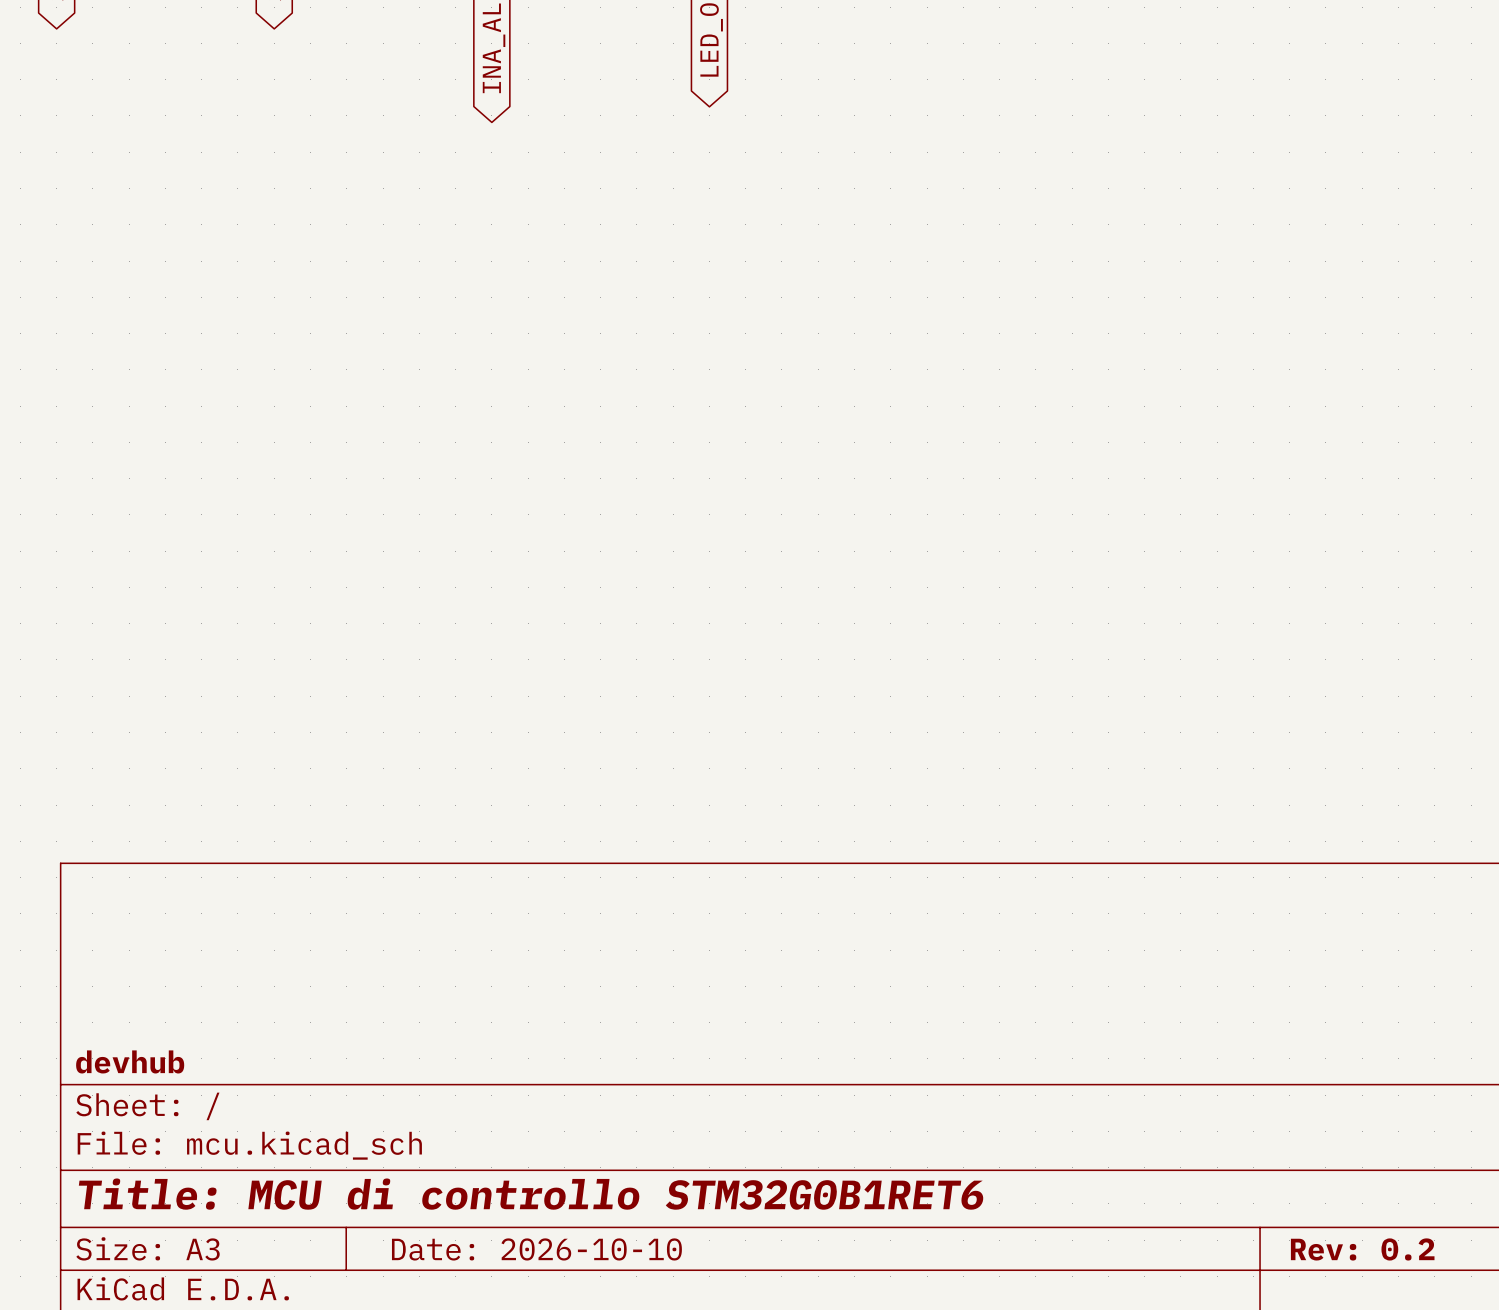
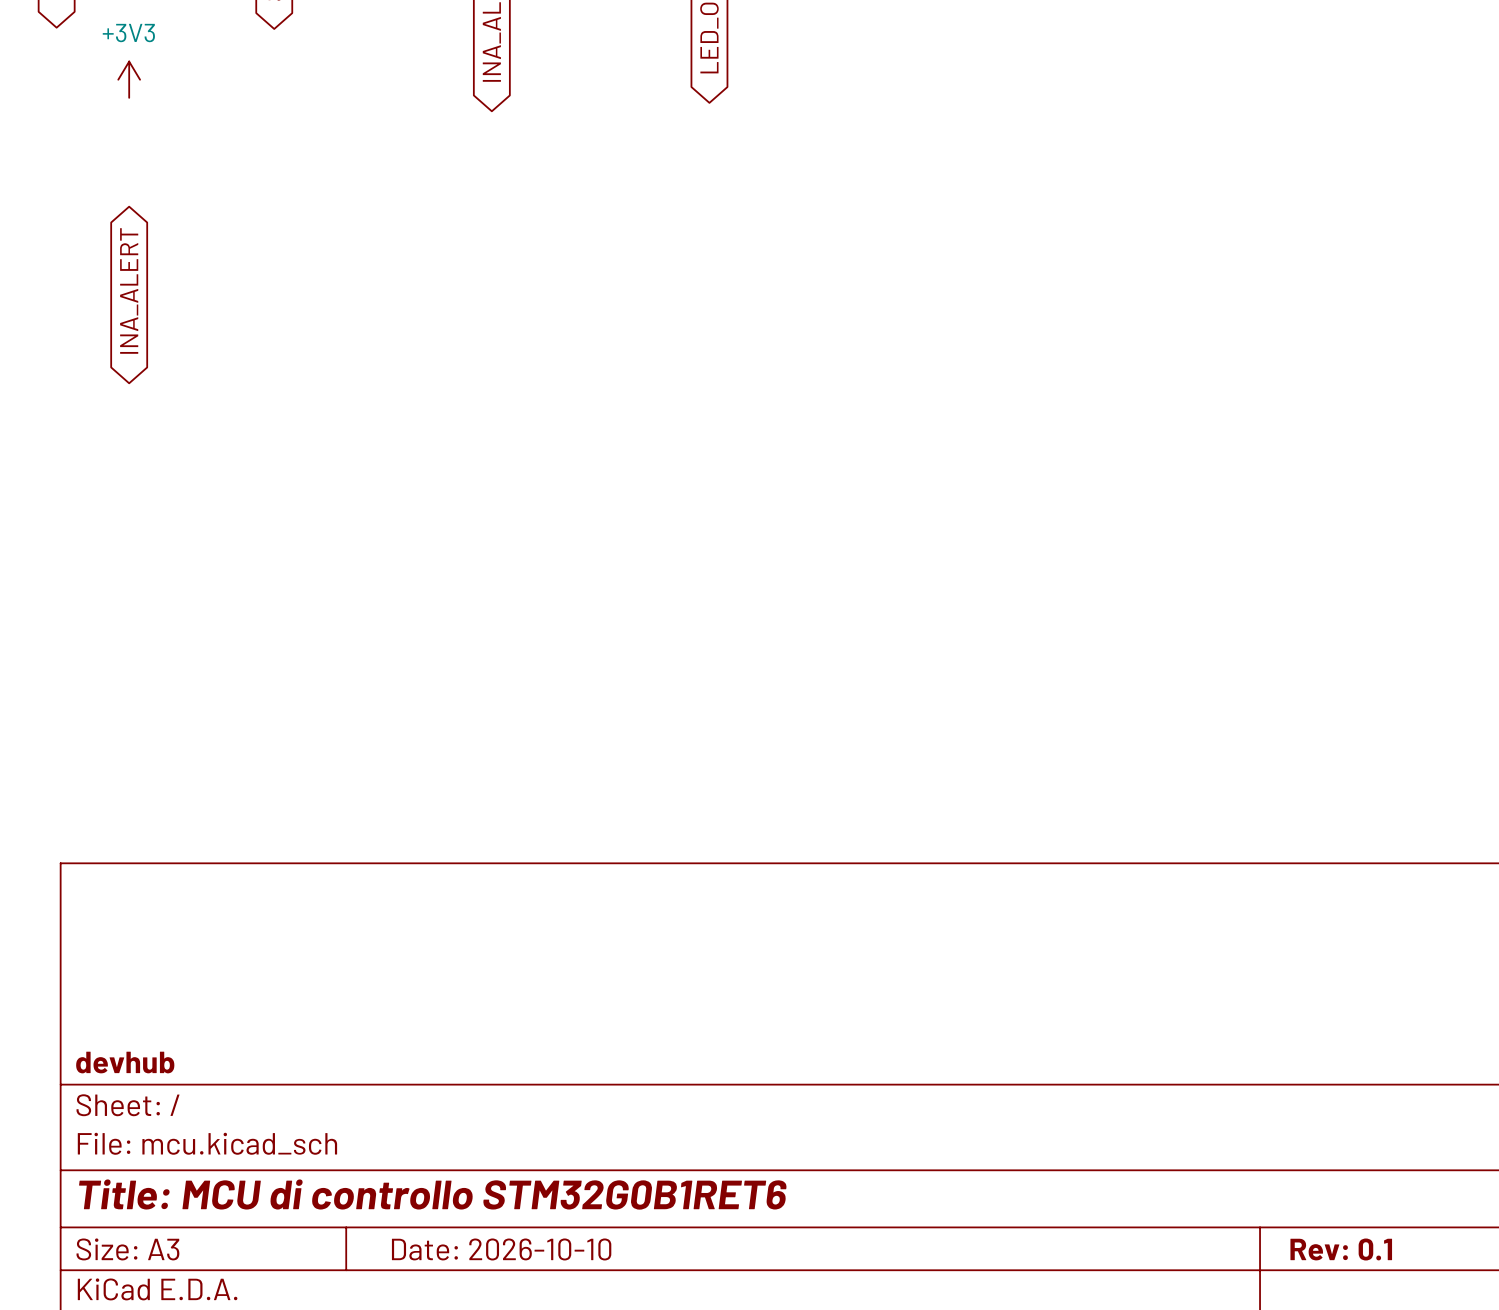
power symbol: none -> +3V3 (129, 79)
global label: none -> INA_ALERT (129, 290)
title block: Rev: 0.2 (1362, 1249) -> Rev: 0.1 (1341, 1249)

